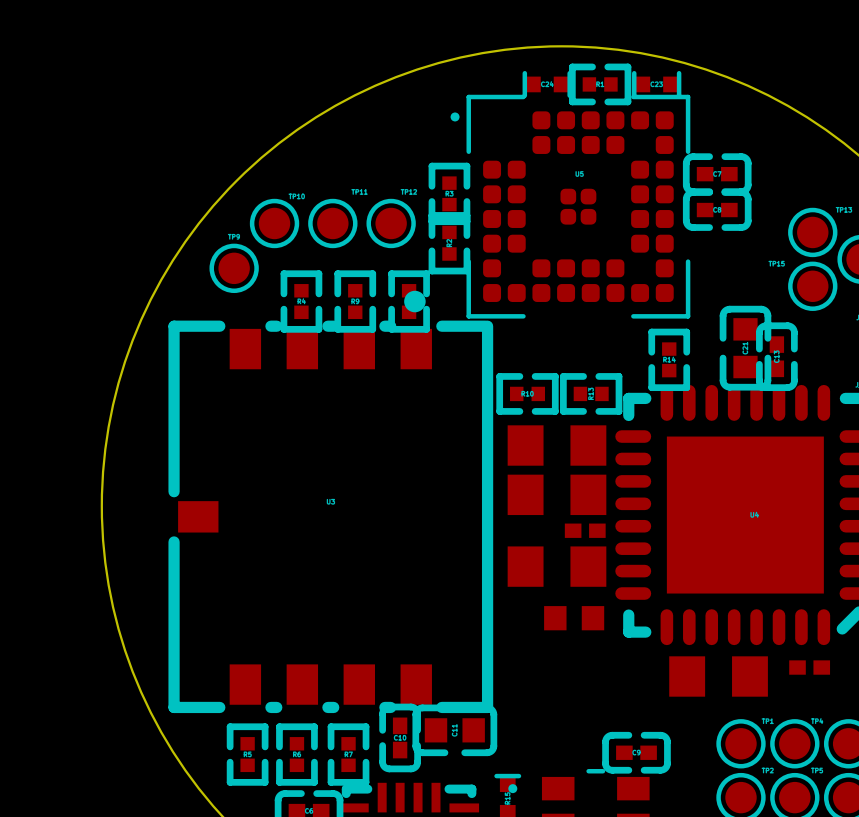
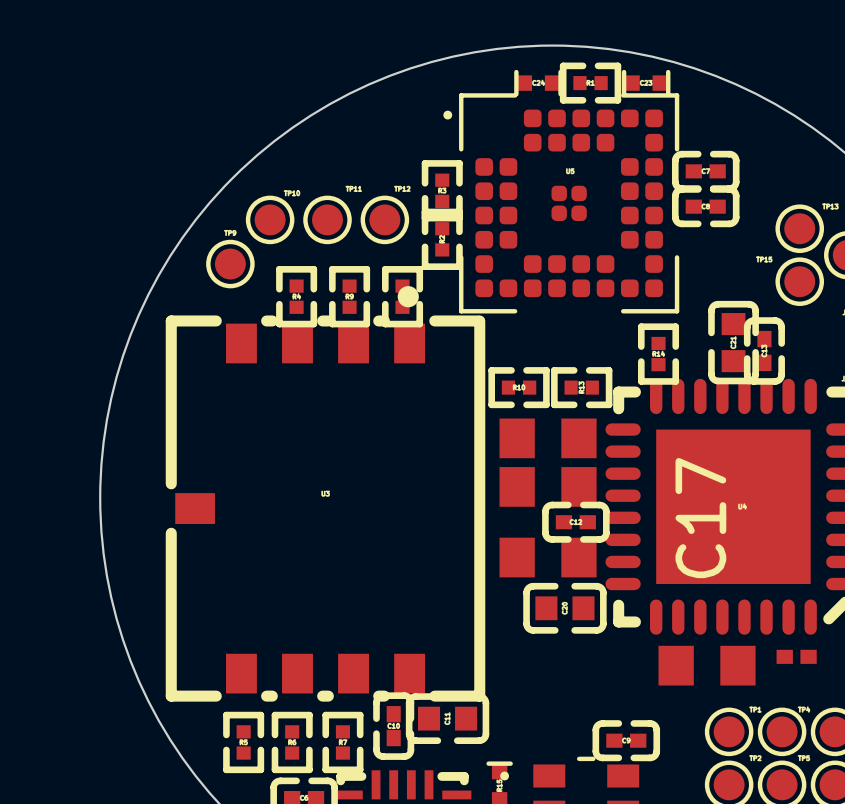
C17 name: none -> C17 (700, 518)
part: (585, 530) -> none
part: none -> (575, 522)
part: none -> (564, 608)

